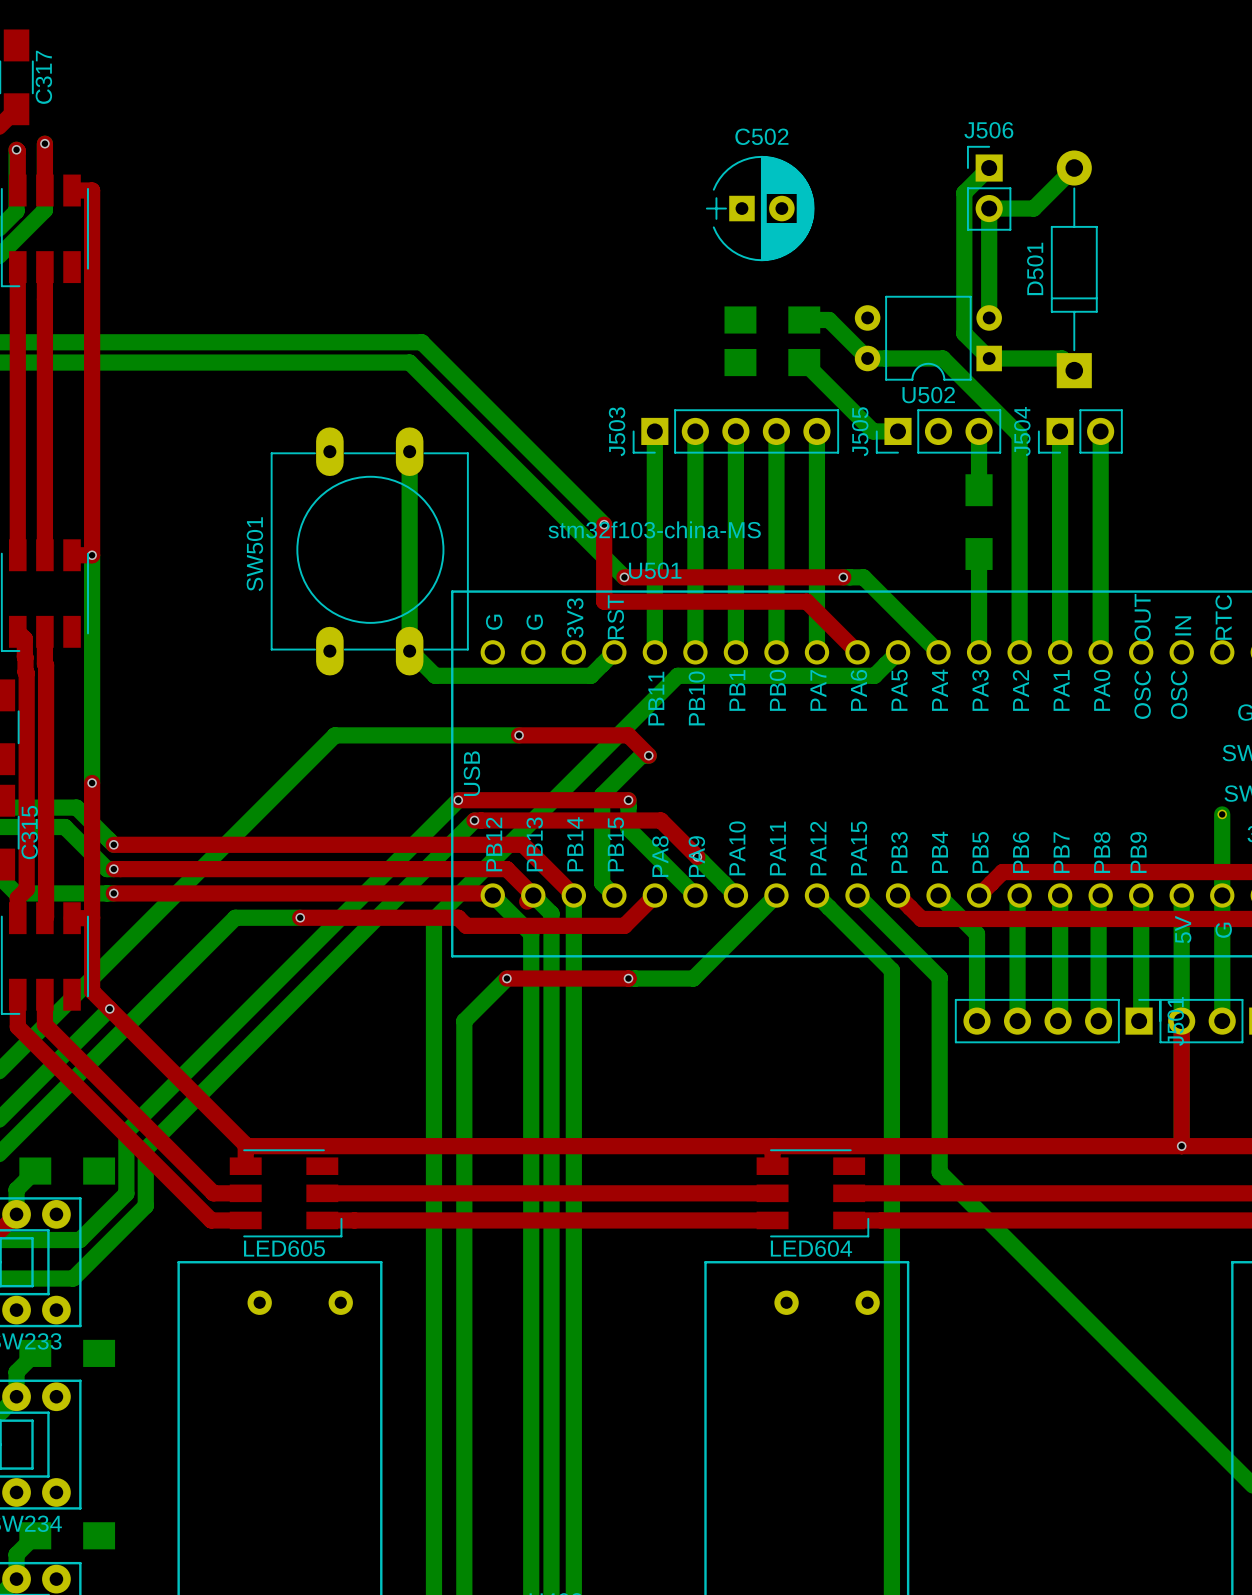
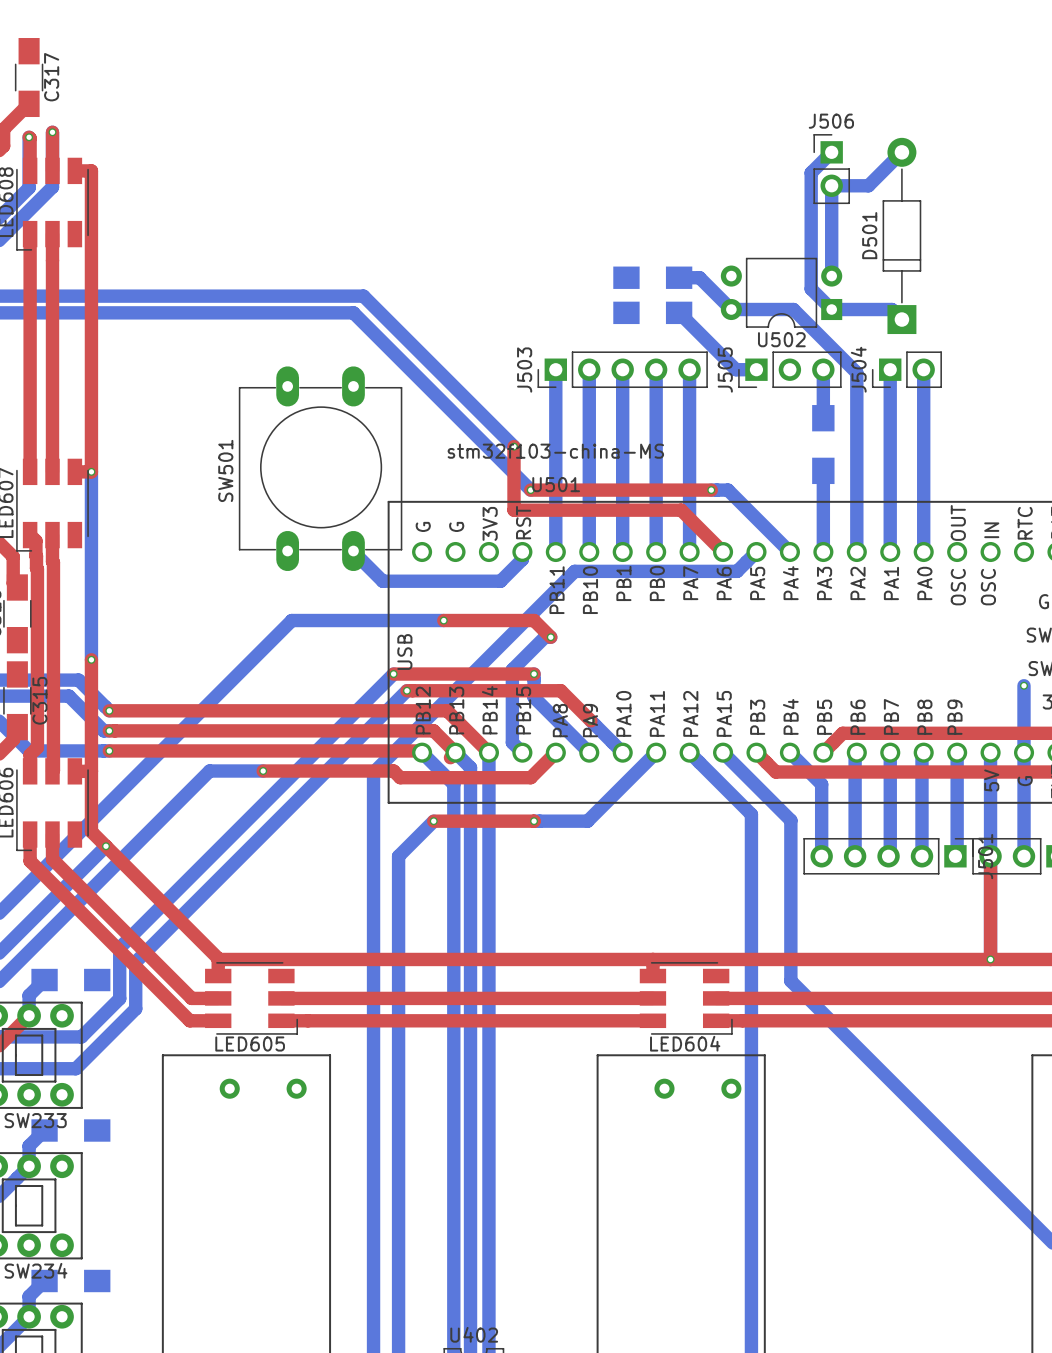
C502: (760, 208) -> none
bottom track: (409, 451) (409, 651) (435, 675) (590, 675) (614, 652) -> (352, 551) (382, 581) (500, 581) (522, 559) (522, 552)

